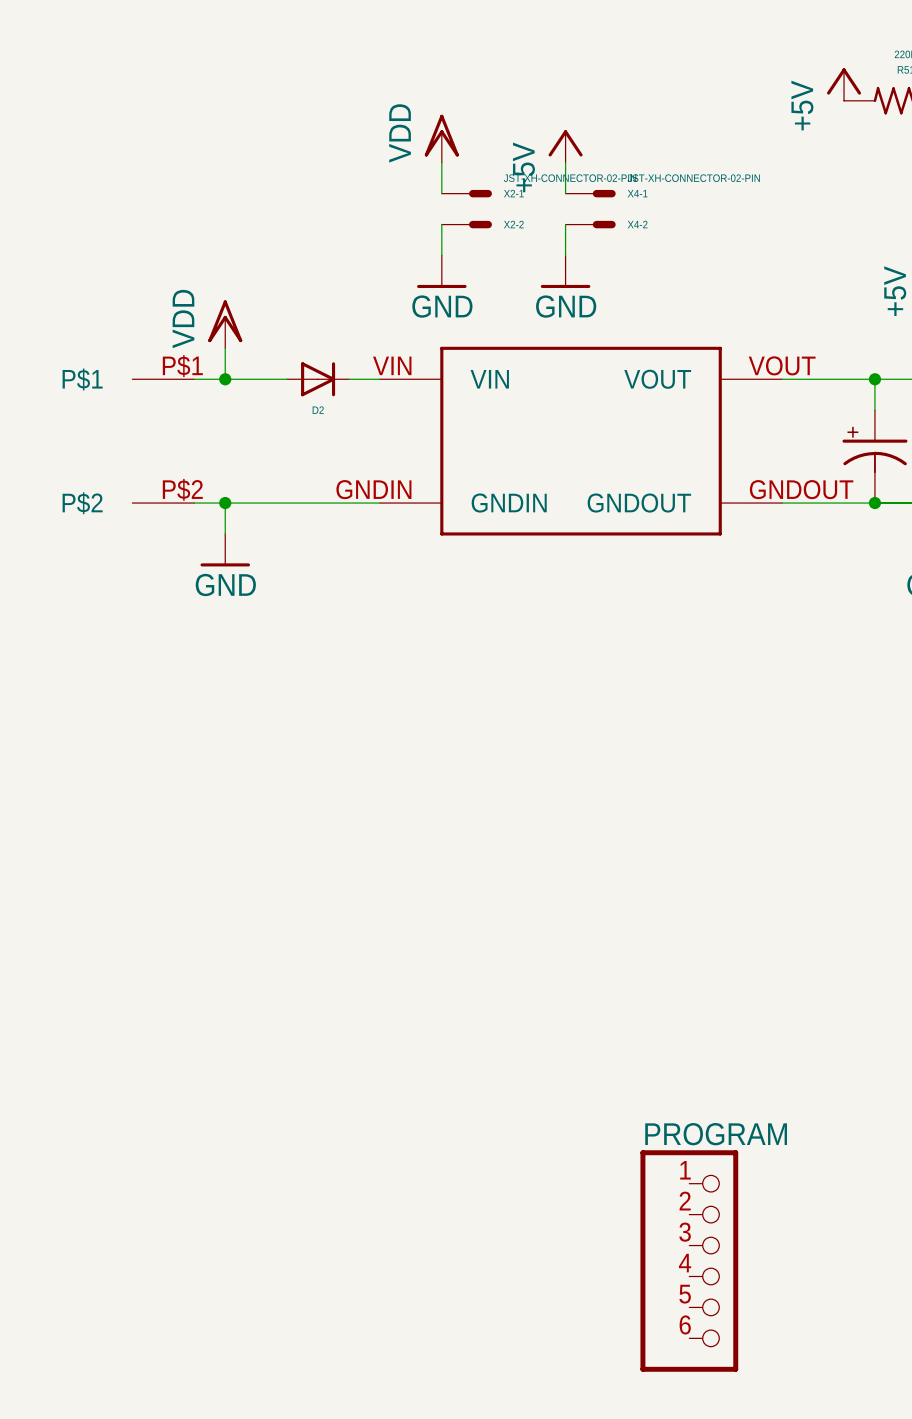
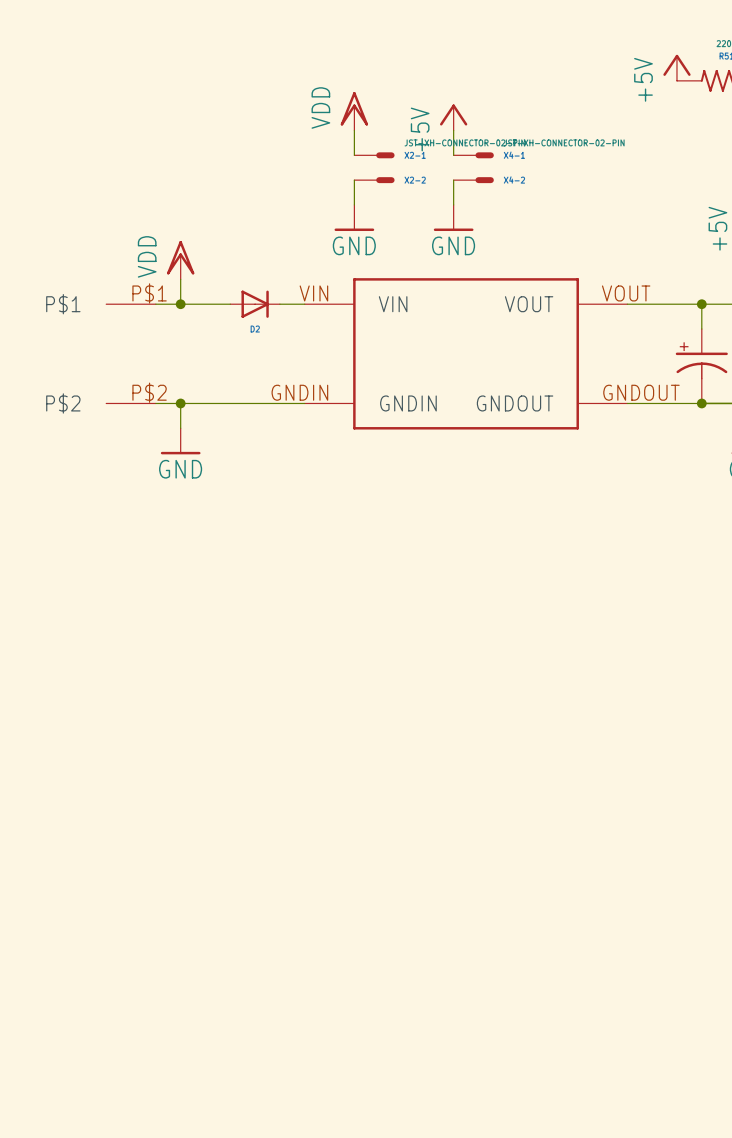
PROGRAM: (689, 1261) -> none

